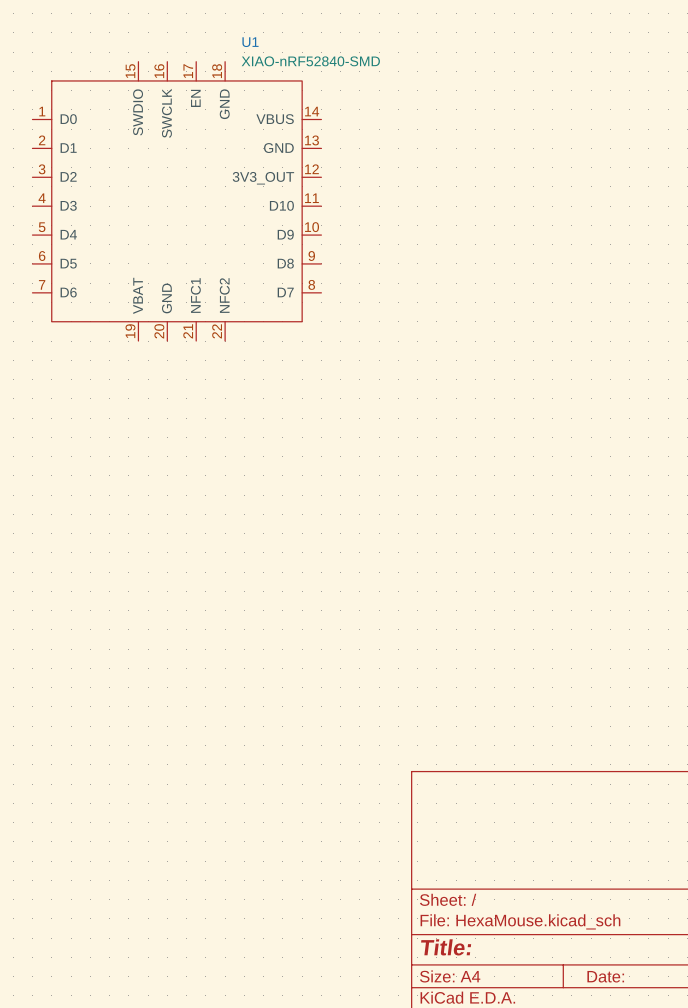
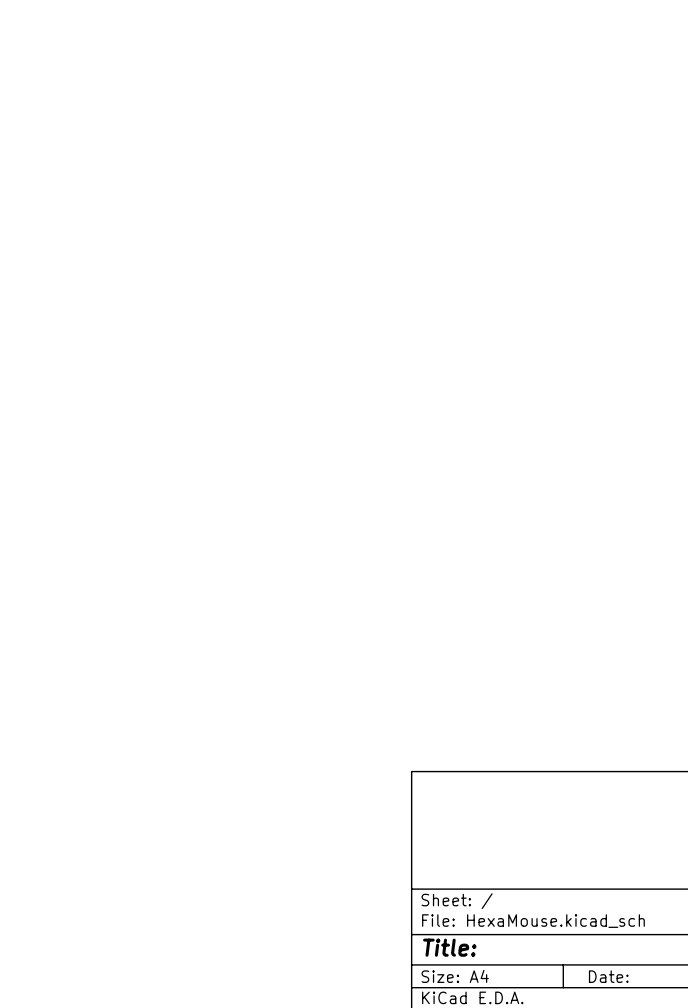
U1: XIAO-nRF52840-SMD (176, 201) -> none

